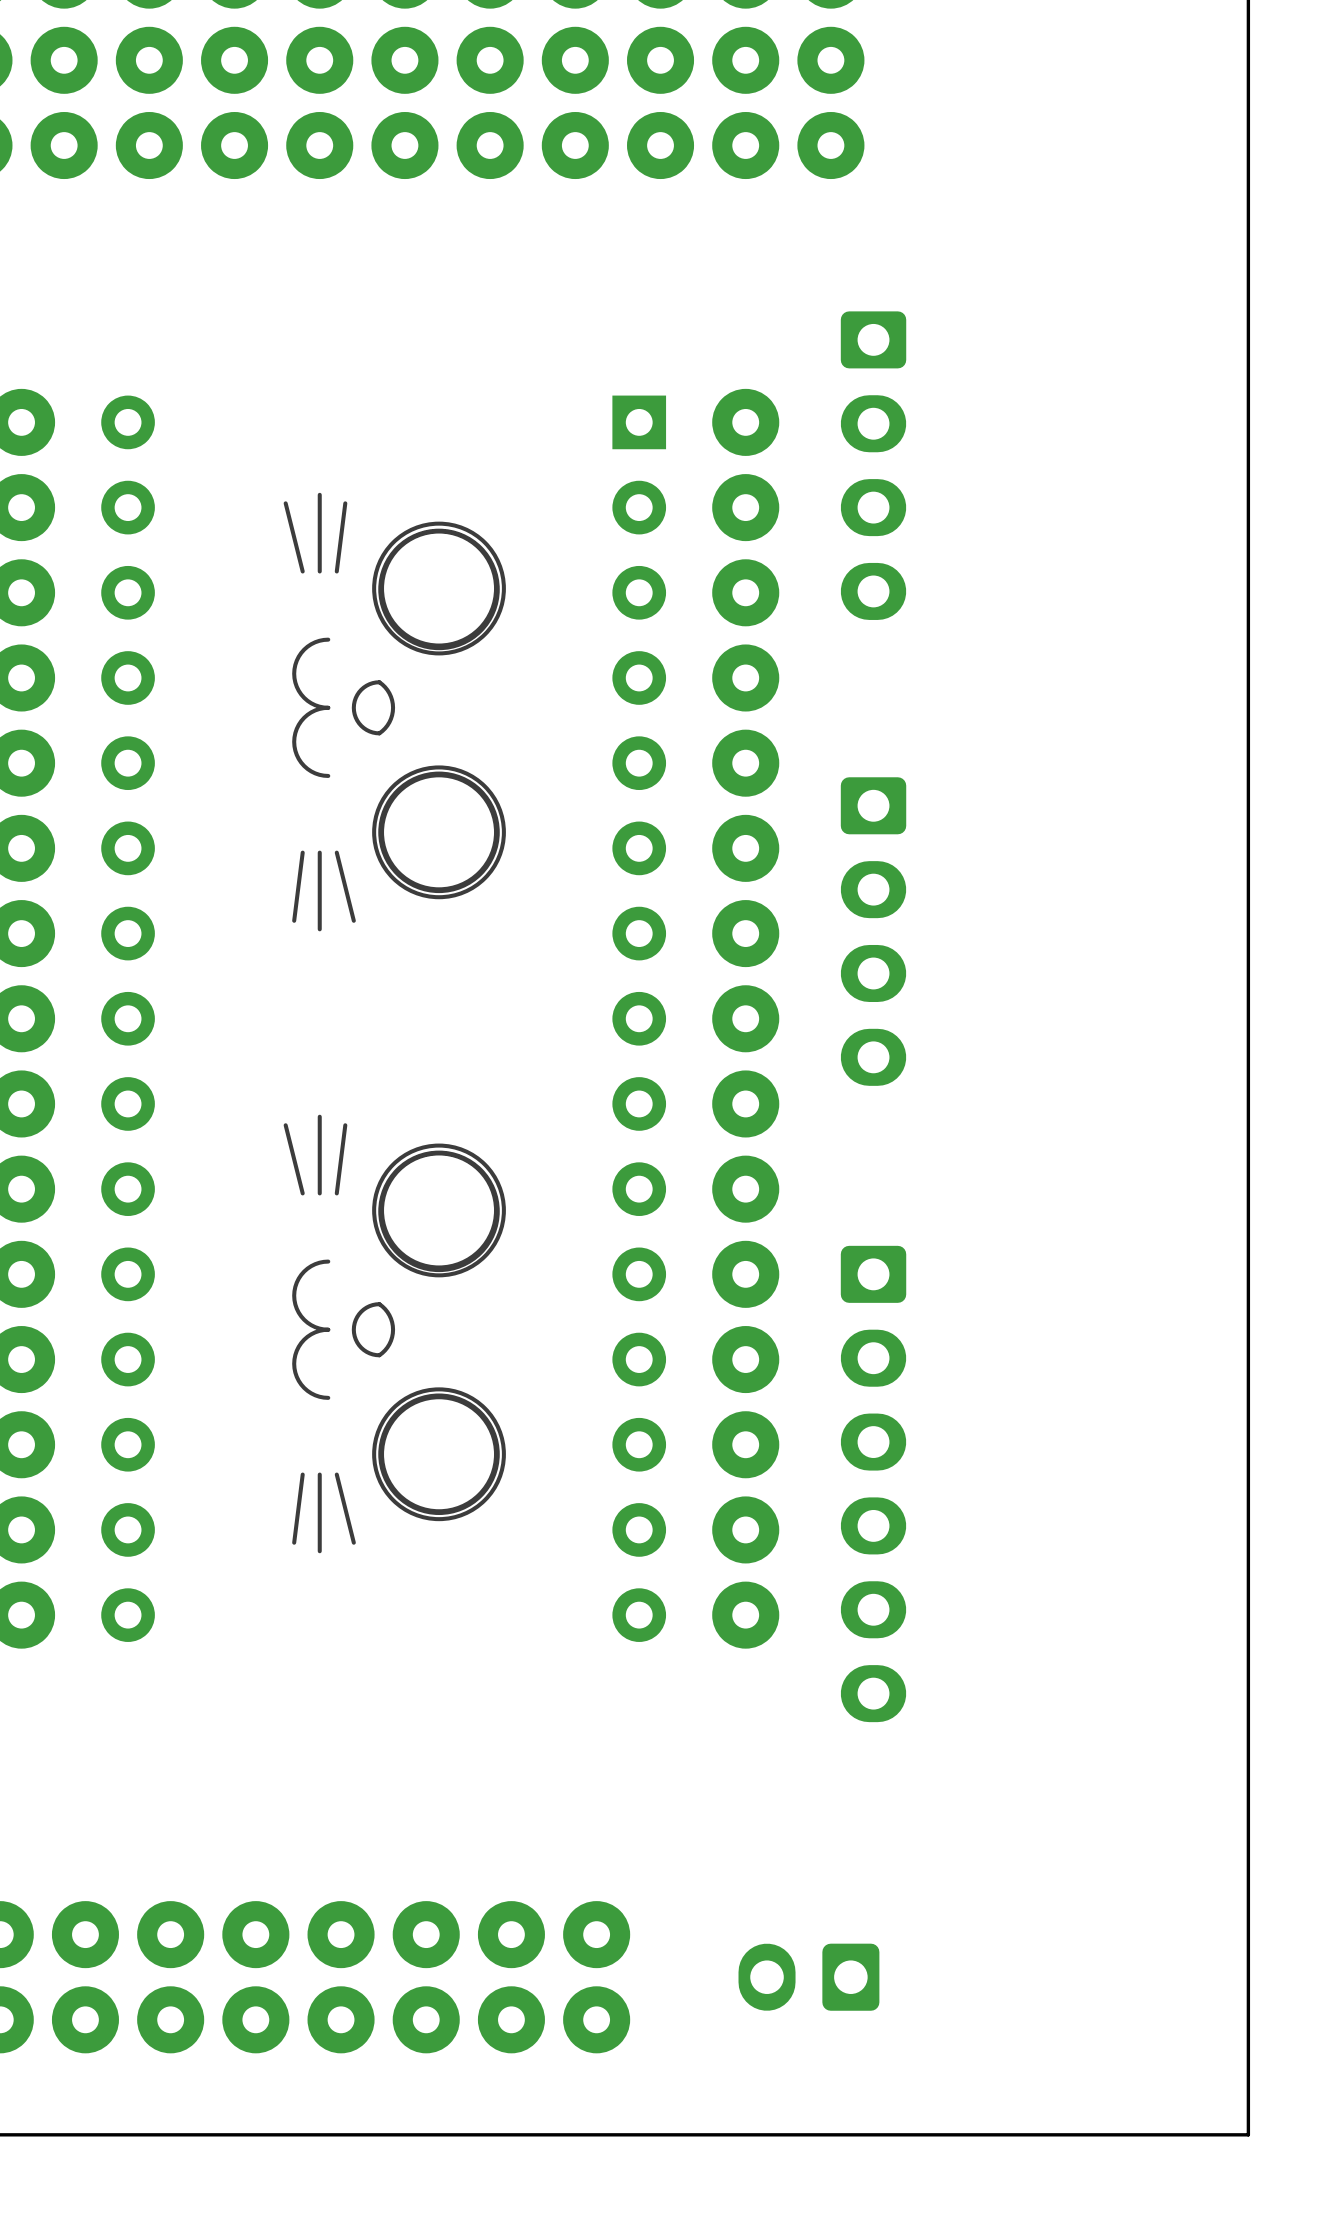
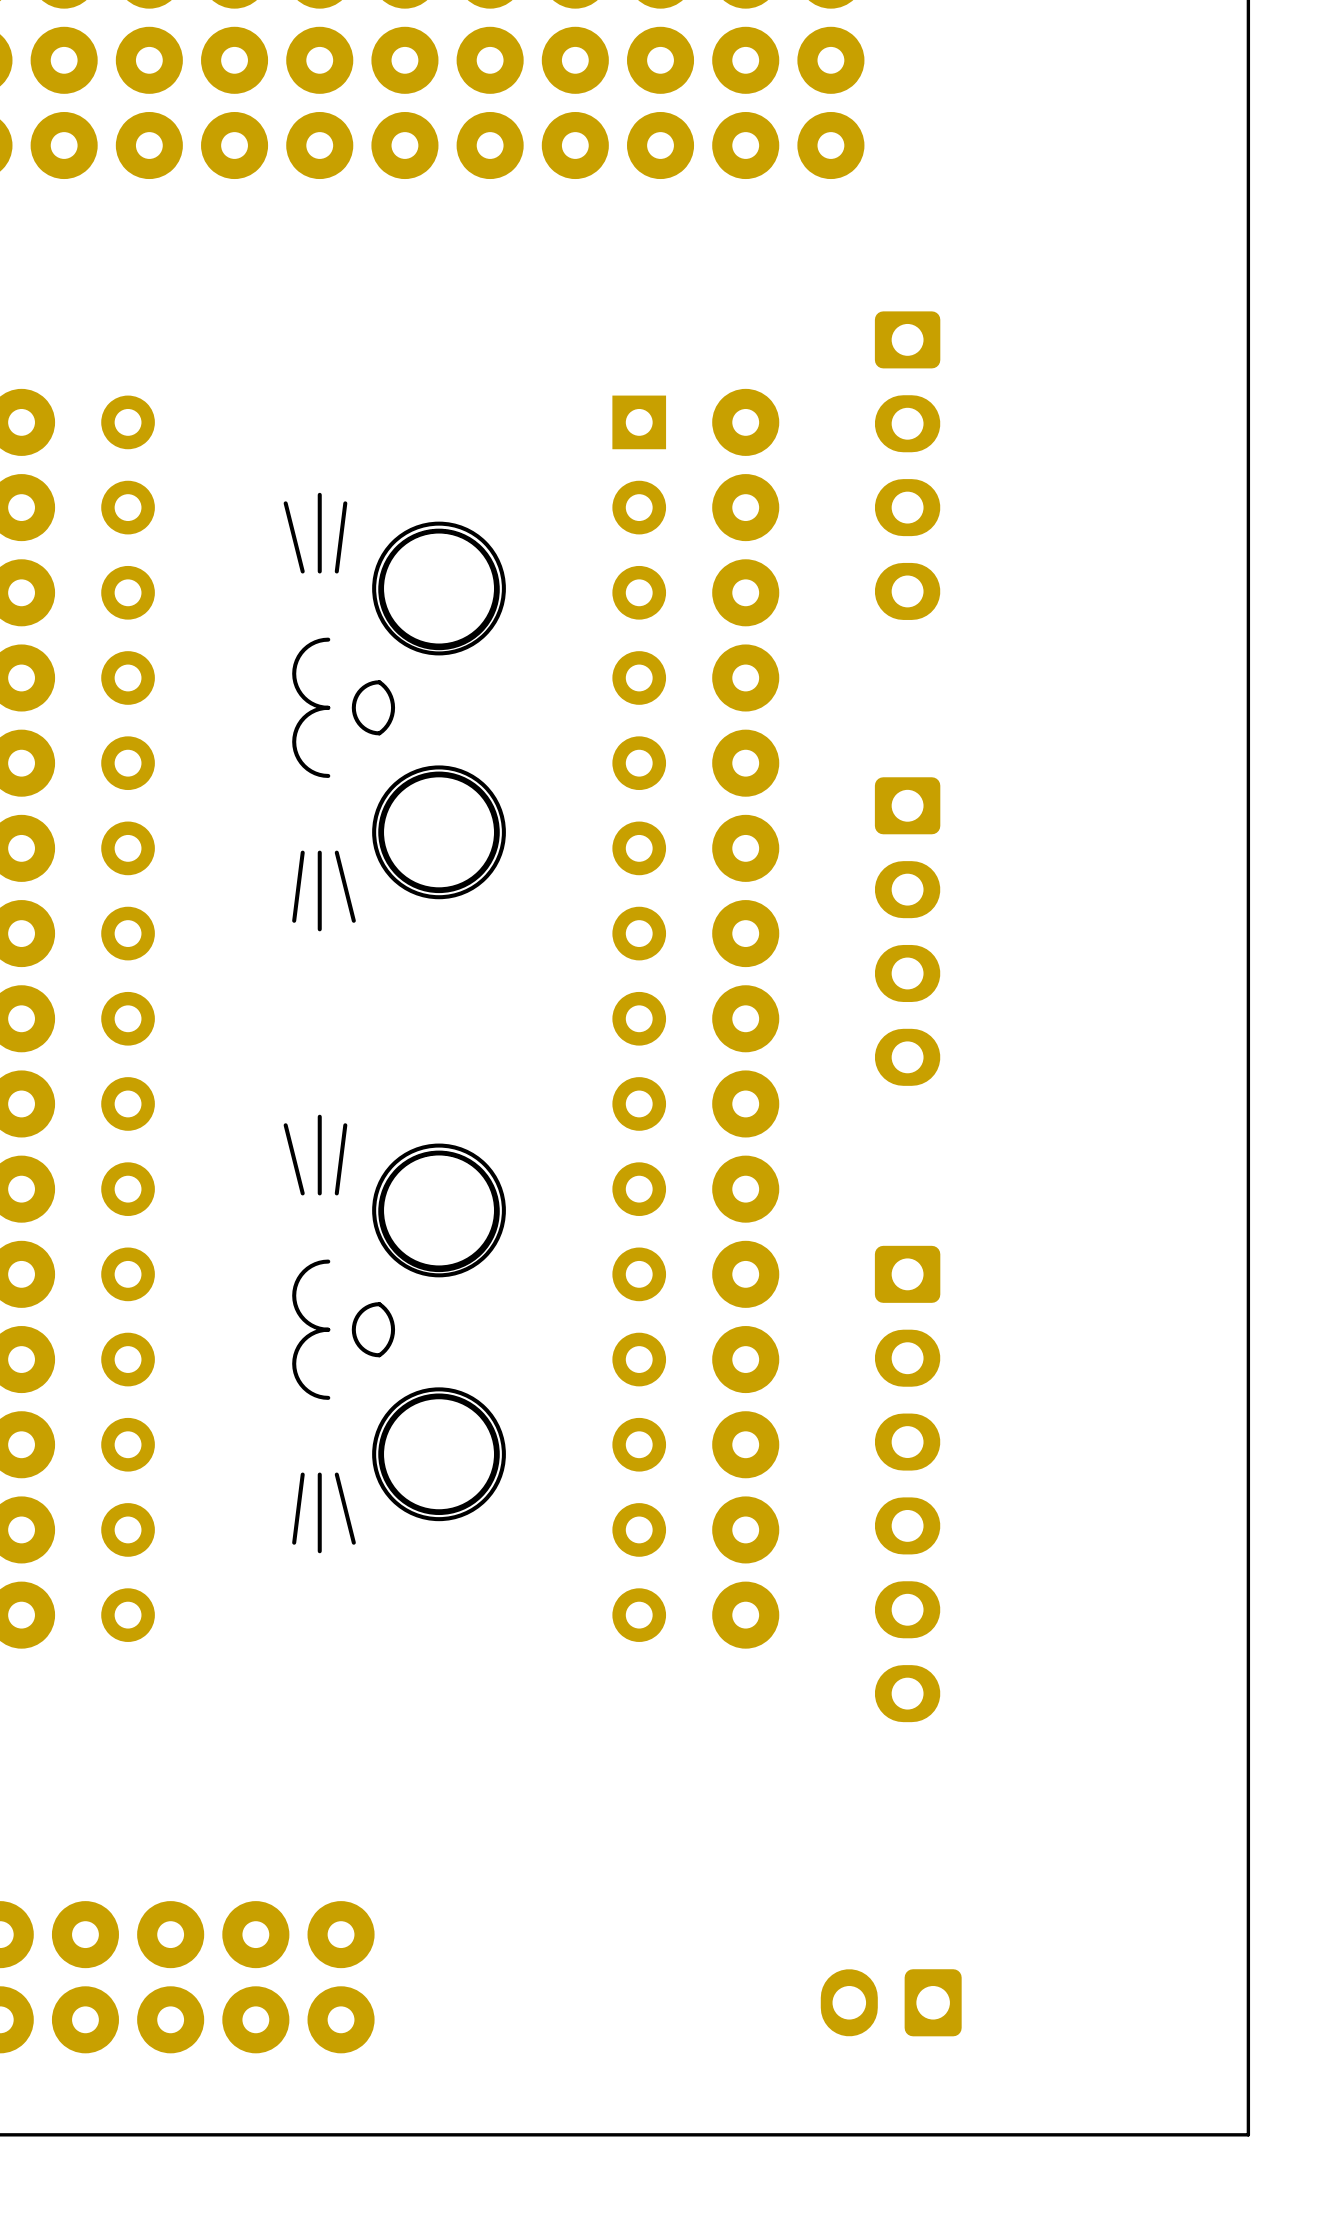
part position: (873, 465) -> (907, 465)
part position: (873, 931) -> (907, 931)
part position: (873, 1483) -> (907, 1483)
part: (426, 1934) -> none
part: (511, 1934) -> none
part: (596, 1934) -> none
part position: (808, 1977) -> (891, 2002)
part: (426, 2019) -> none
part: (511, 2019) -> none
part: (596, 2019) -> none

